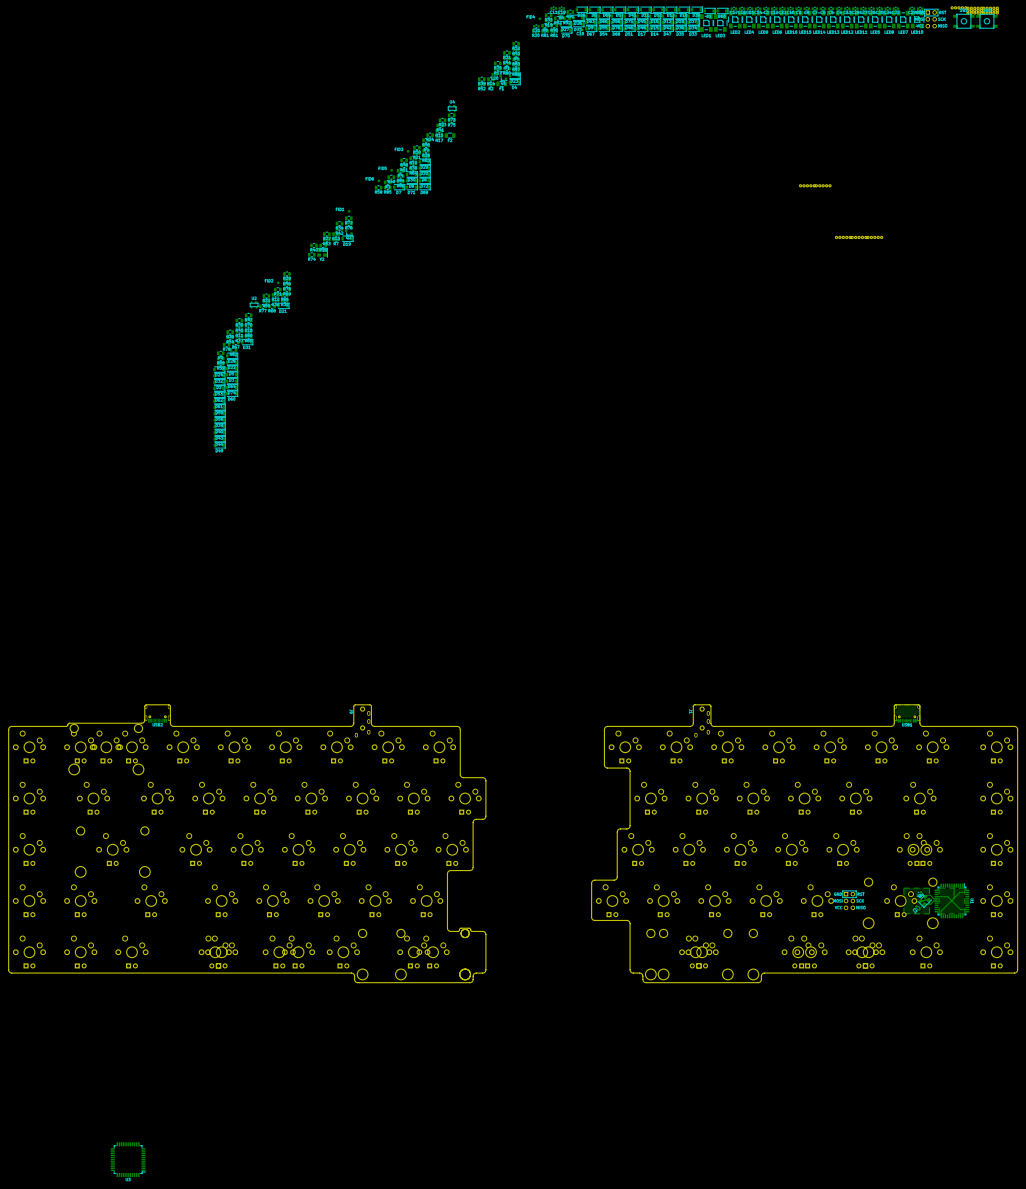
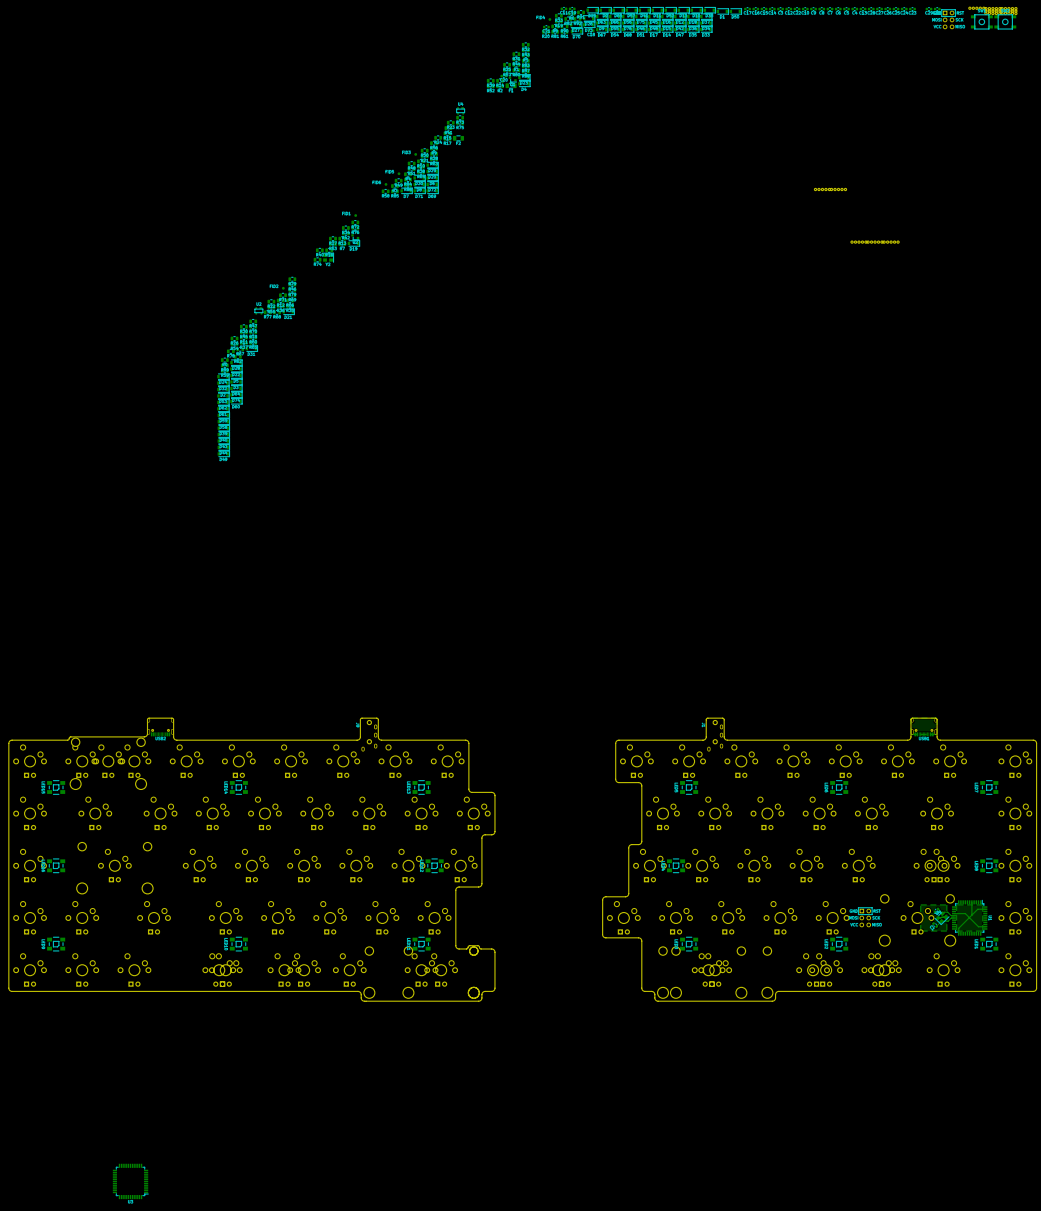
part rotation: 0° (735, 19) -> 90° clockwise (839, 944)
part position: (735, 19) -> (839, 944)
part rotation: 0° (749, 19) -> 90° clockwise (676, 865)
part position: (749, 19) -> (676, 865)
part rotation: 0° (763, 19) -> 90° clockwise (56, 944)
part position: (763, 19) -> (56, 944)
part rotation: 0° (777, 19) -> 90° clockwise (839, 787)
part position: (777, 19) -> (839, 787)
part rotation: 0° (791, 19) -> 90° clockwise (56, 865)
part position: (791, 19) -> (56, 865)
part rotation: 0° (805, 19) -> 90° clockwise (56, 787)
part position: (805, 19) -> (56, 787)
part rotation: 0° (819, 19) -> 90° clockwise (238, 787)
part position: (819, 19) -> (238, 787)
part rotation: 0° (833, 19) -> 90° clockwise (421, 787)
part position: (833, 19) -> (421, 787)
part rotation: 0° (847, 19) -> 90° clockwise (434, 865)
part position: (847, 19) -> (434, 865)
part rotation: 0° (861, 19) -> 90° clockwise (421, 944)
part position: (861, 19) -> (421, 944)
part rotation: 0° (875, 19) -> 90° clockwise (689, 787)
part position: (875, 19) -> (689, 787)
part rotation: 0° (889, 19) -> 90° clockwise (989, 865)
part position: (889, 19) -> (989, 865)
part rotation: 0° (903, 19) -> 90° clockwise (989, 787)
part position: (903, 19) -> (989, 787)
part rotation: 0° (917, 19) -> 90° clockwise (238, 944)
part position: (917, 19) -> (238, 944)
part rotation: 0° (706, 23) -> 90° clockwise (989, 944)
part position: (706, 23) -> (989, 944)
part rotation: 0° (720, 23) -> 90° clockwise (689, 944)
part position: (720, 23) -> (689, 944)

